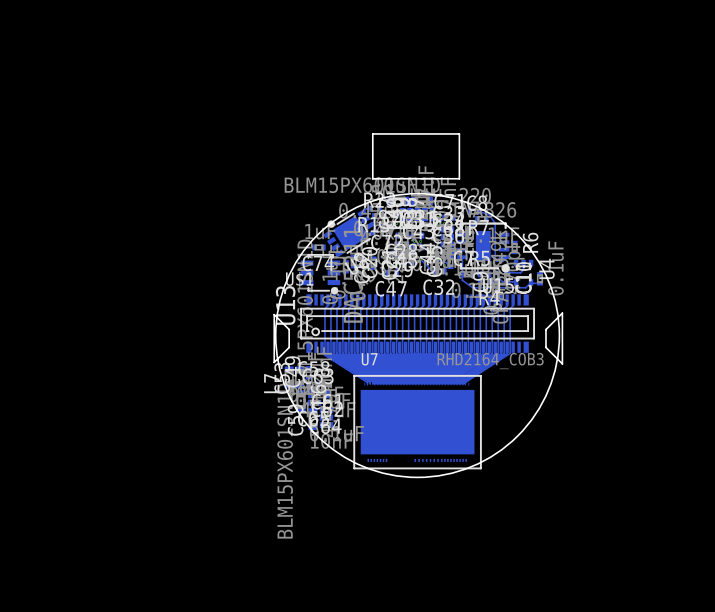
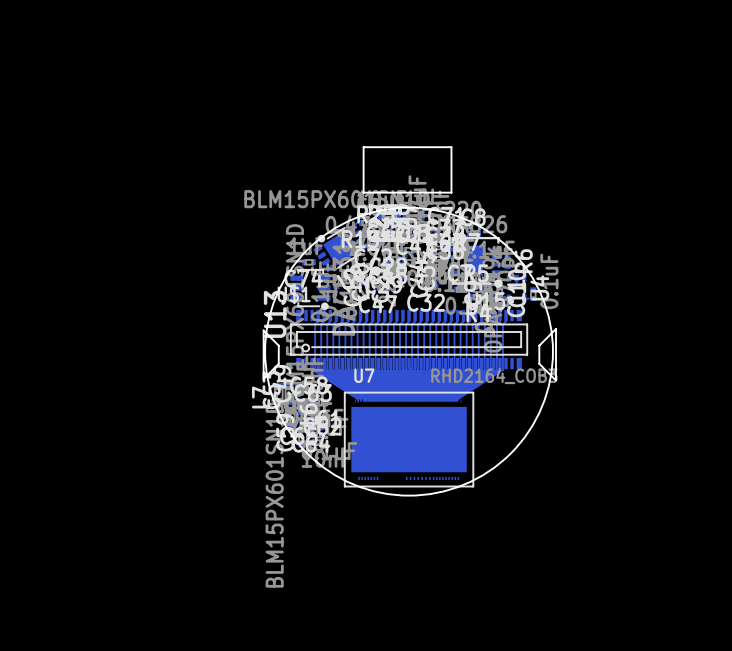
track: (478, 211) (489, 214) (495, 223) (495, 259) (503, 260) (504, 257) -> none
track: (462, 257) (462, 280) (472, 287) (525, 287) (531, 282) -> none
track: (420, 259) (432, 271) (435, 271) -> none

